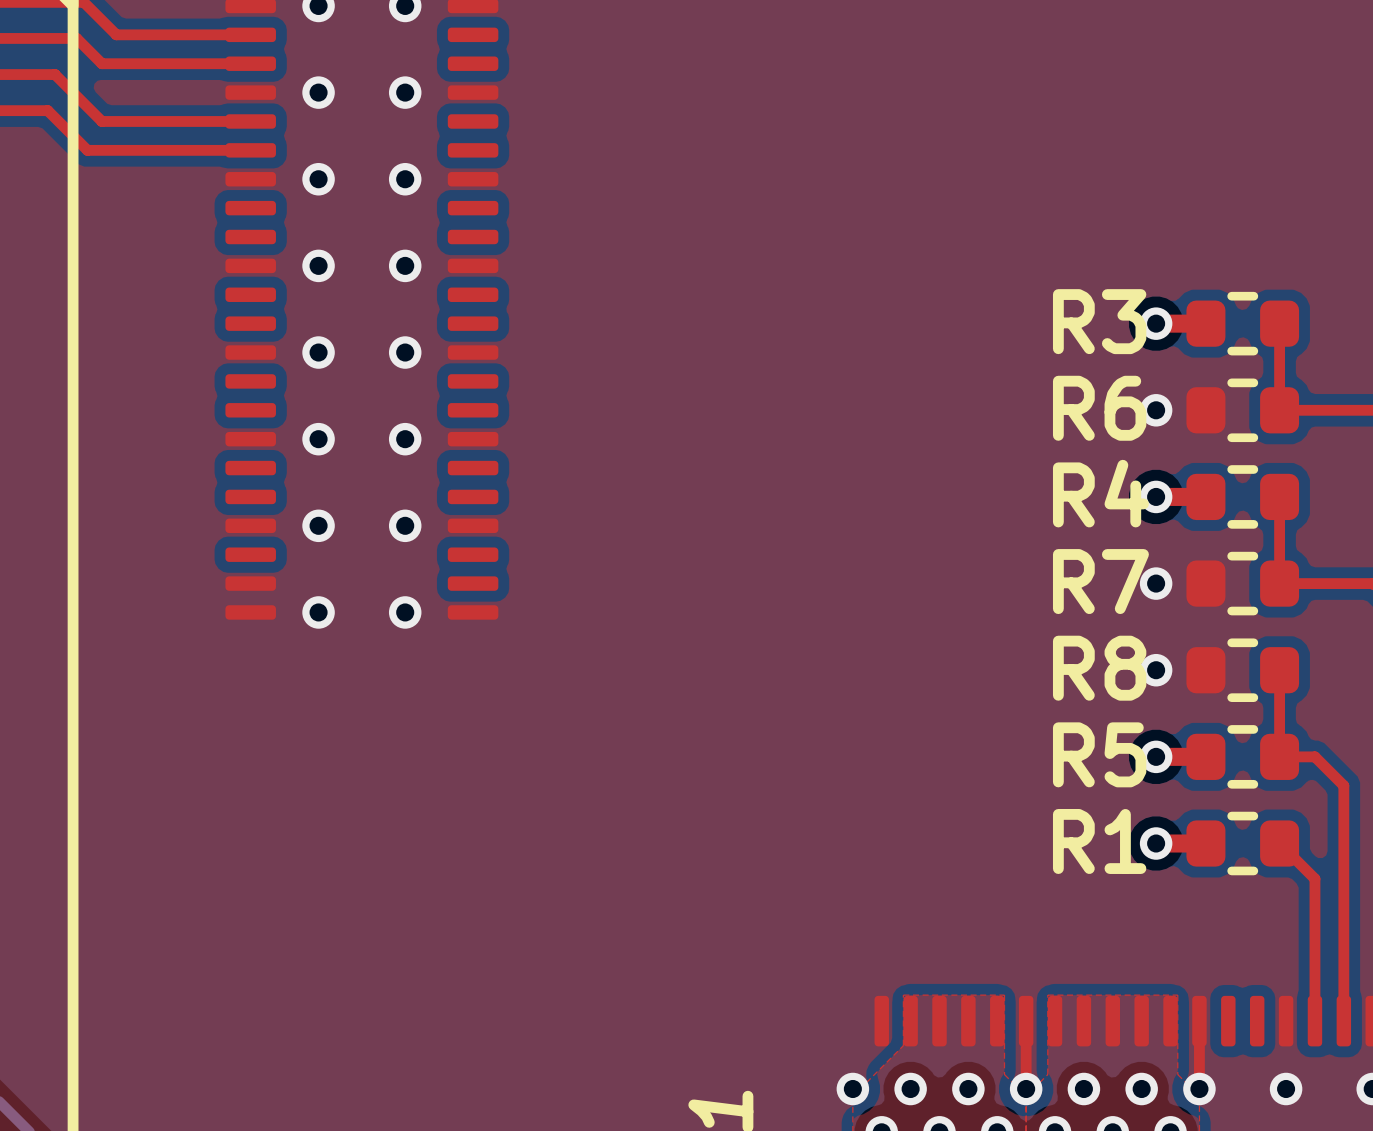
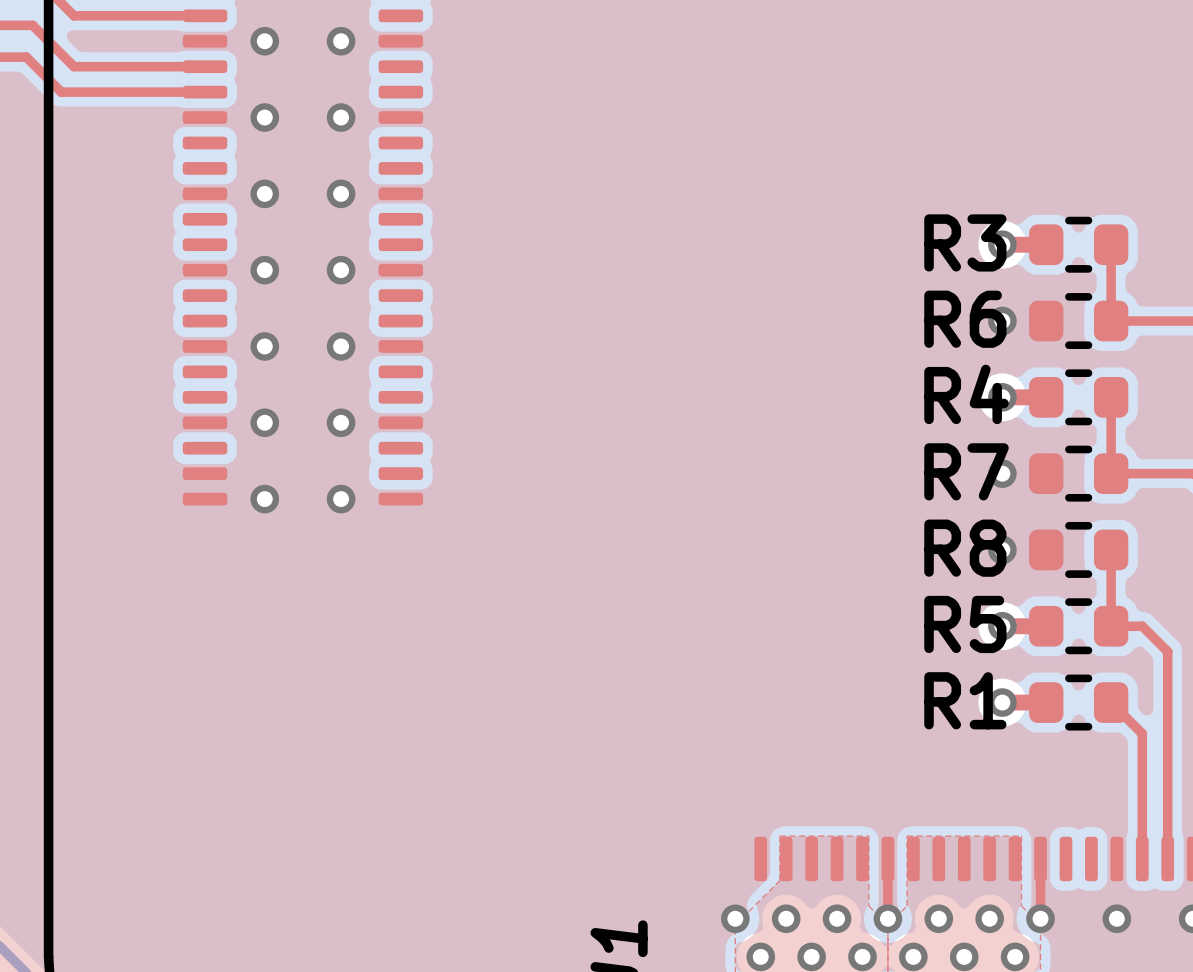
R3 name position: R3 (1099, 321) -> R3 (965, 242)
R6 name position: R6 (1099, 408) -> R6 (965, 319)
R4 name position: R4 (1100, 493) -> R4 (966, 394)
R7 name position: R7 (1100, 581) -> R7 (966, 471)
R8 name position: R8 (1099, 668) -> R8 (965, 548)
R5 name position: R5 (1099, 754) -> R5 (965, 624)
R1 name position: R1 (1099, 841) -> R1 (965, 700)

